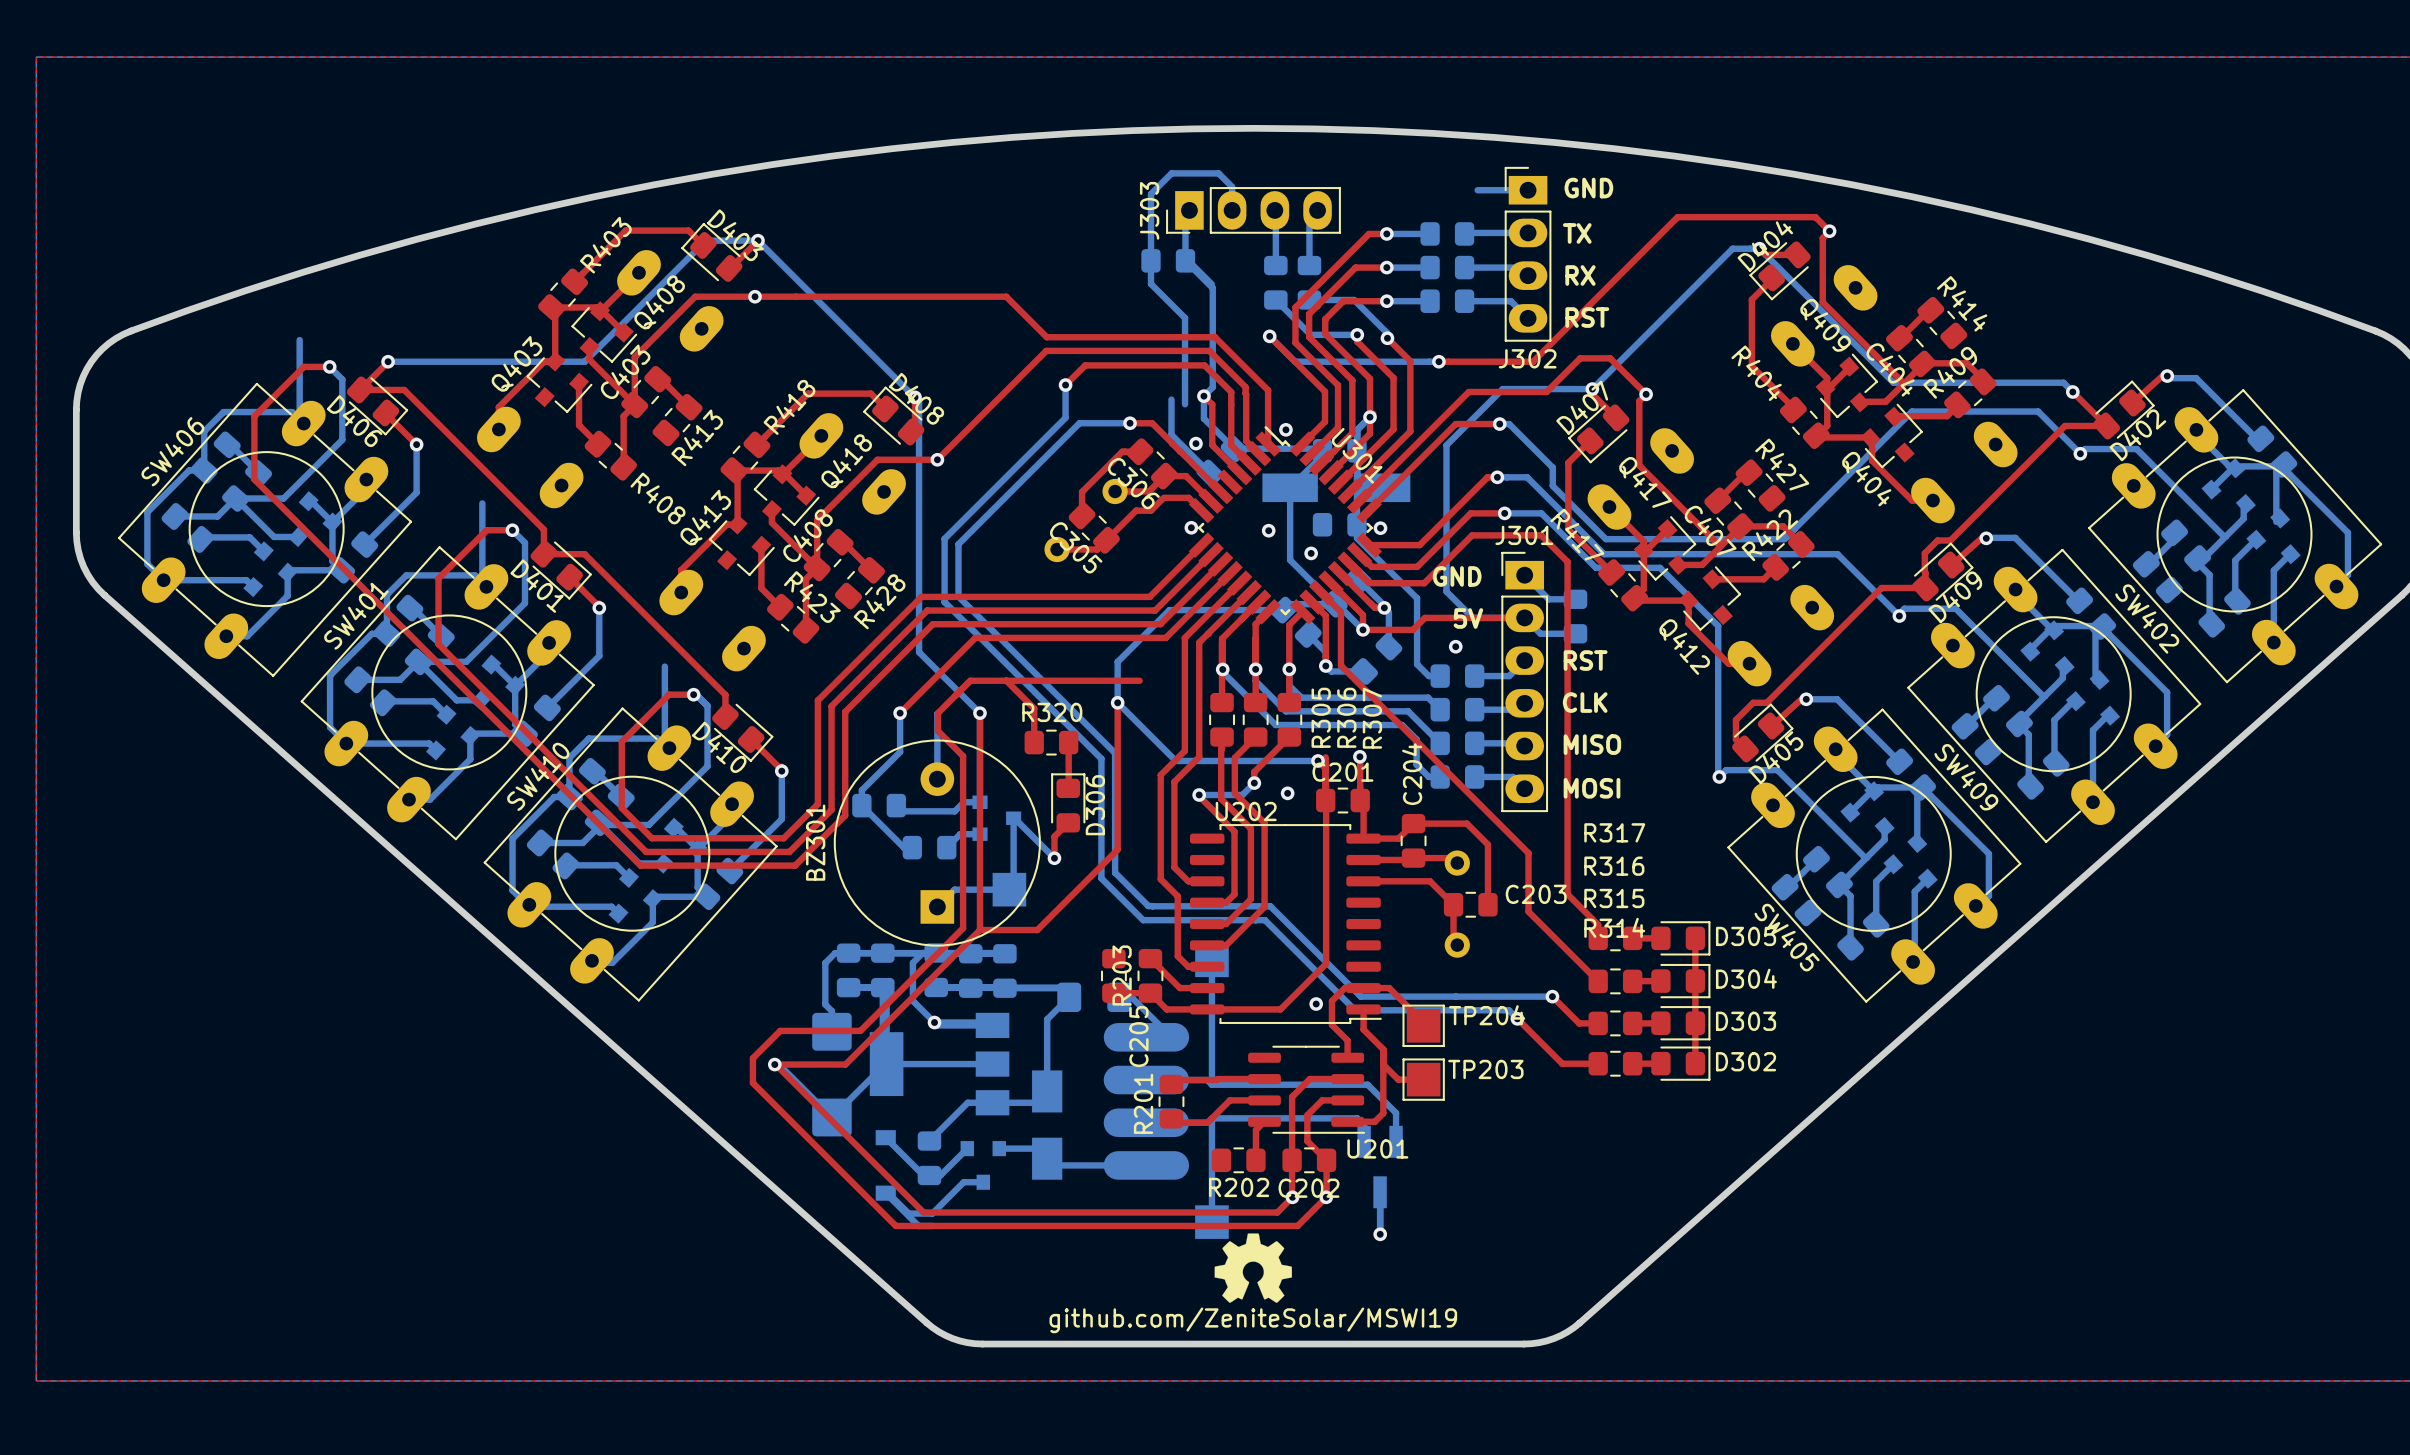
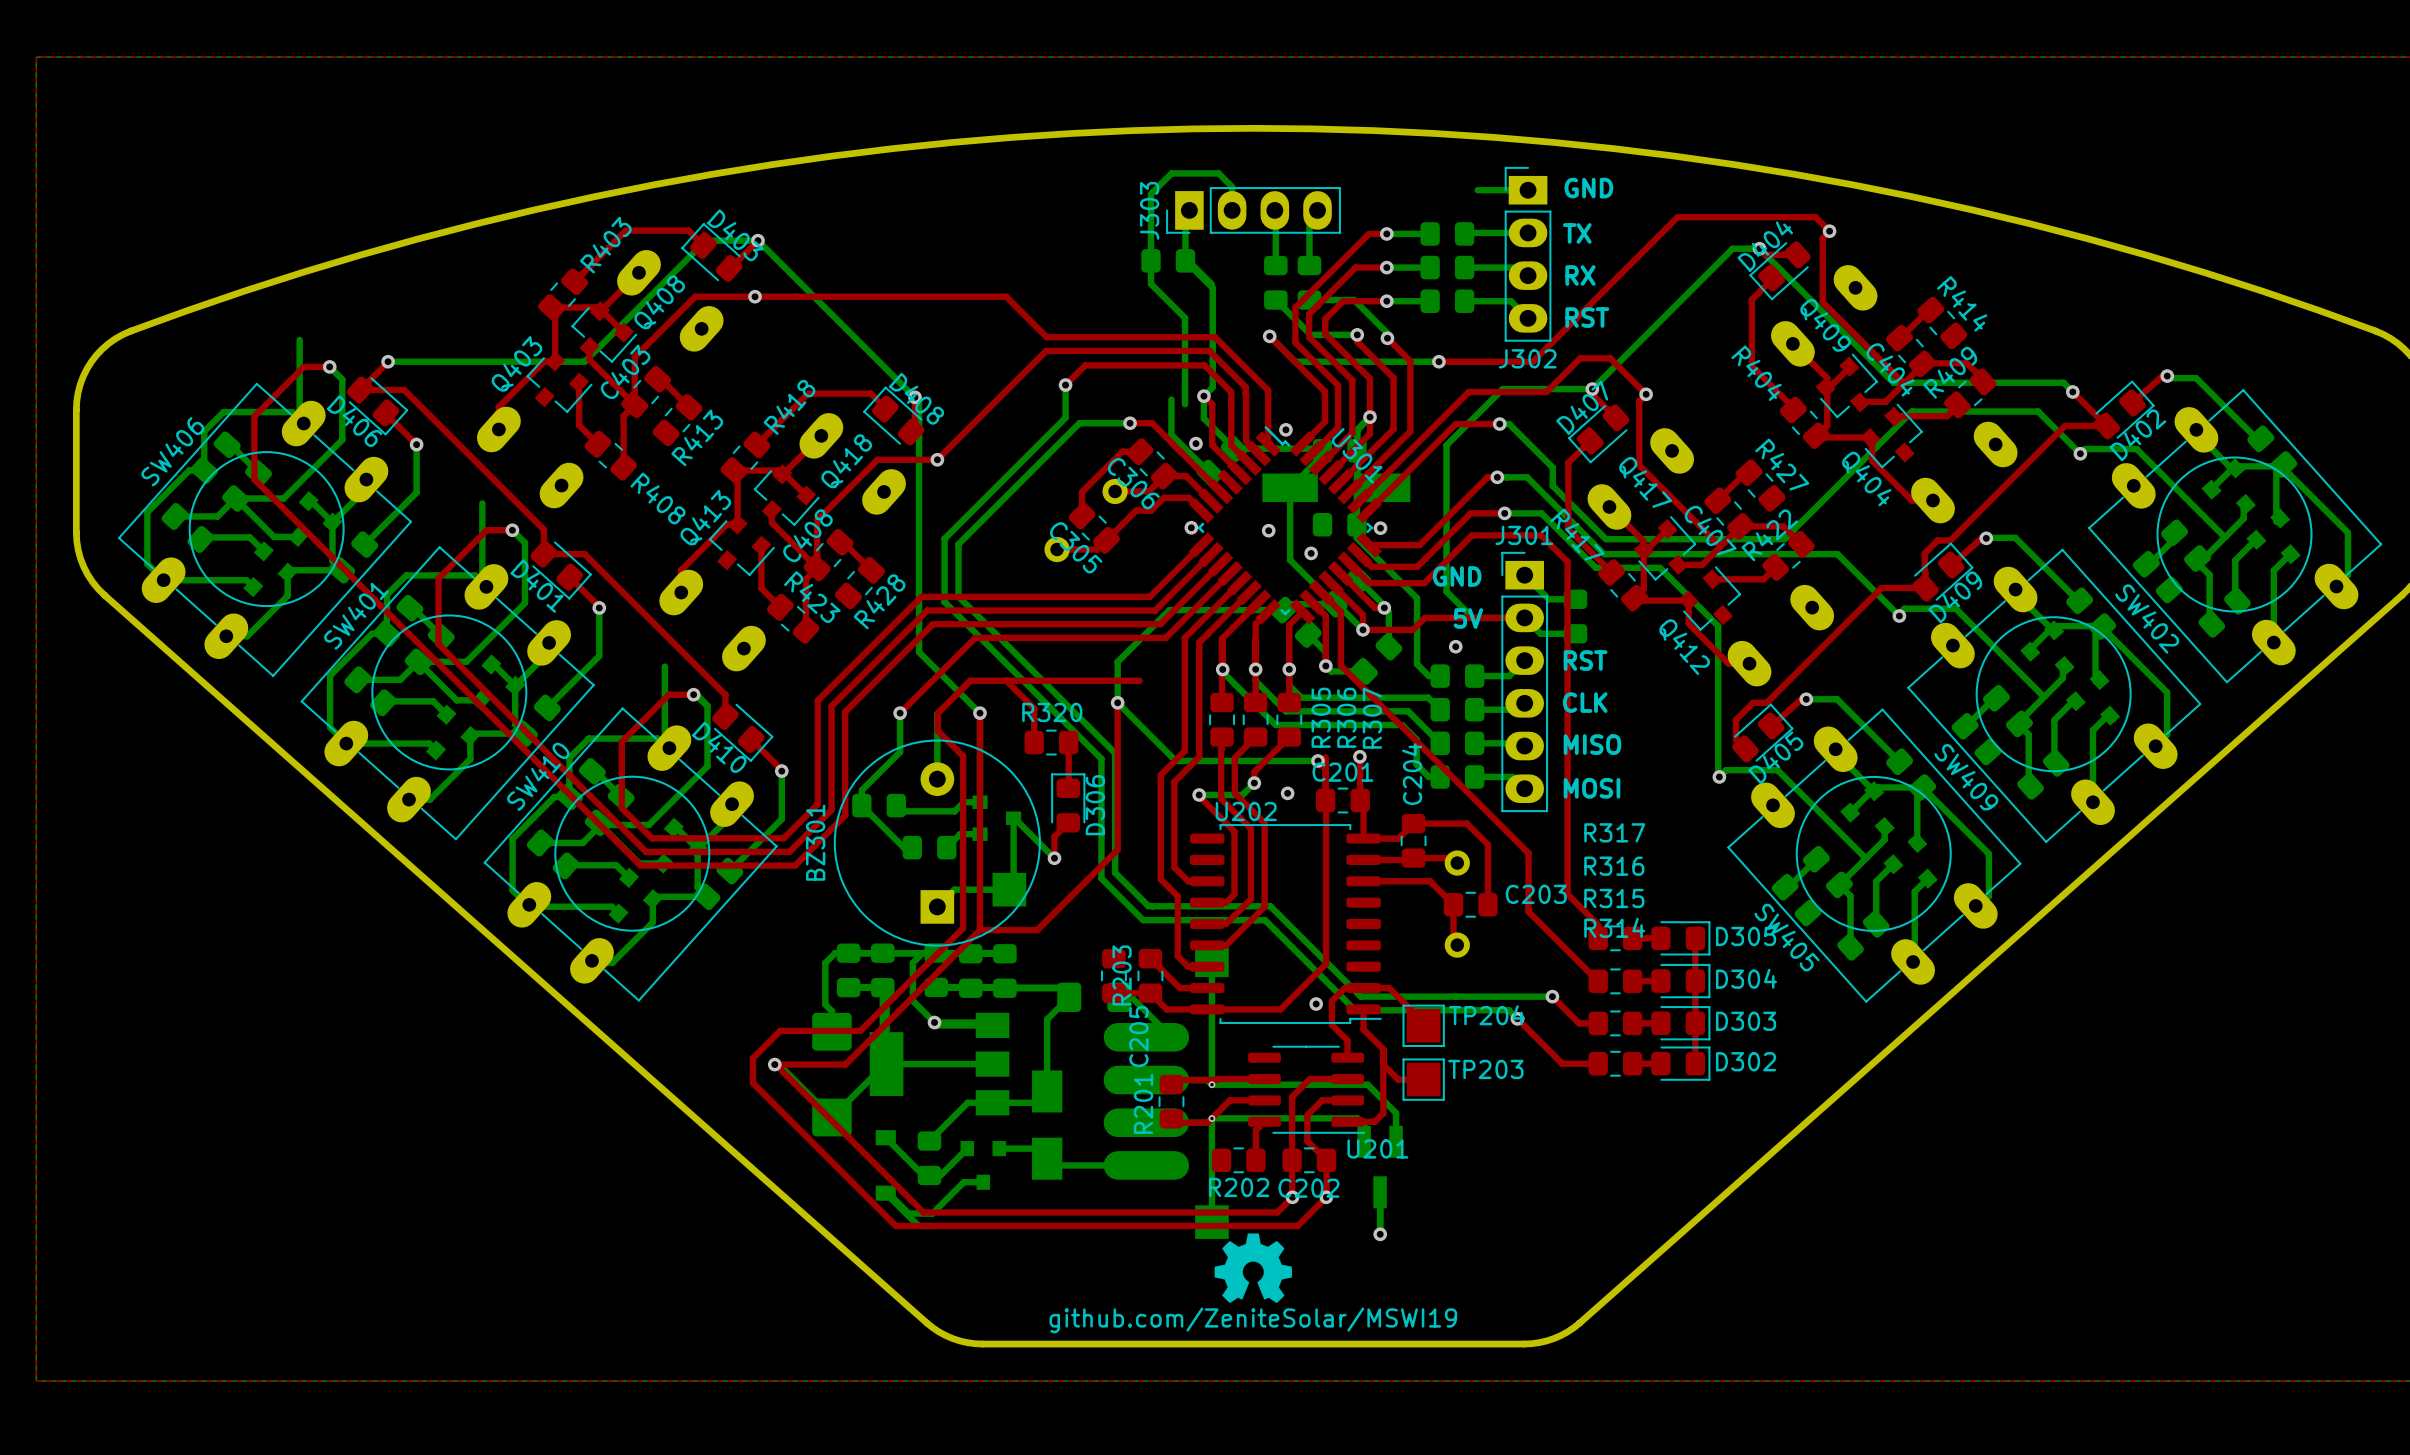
via: none -> (1211, 1084)
via: none -> (1211, 1118)

